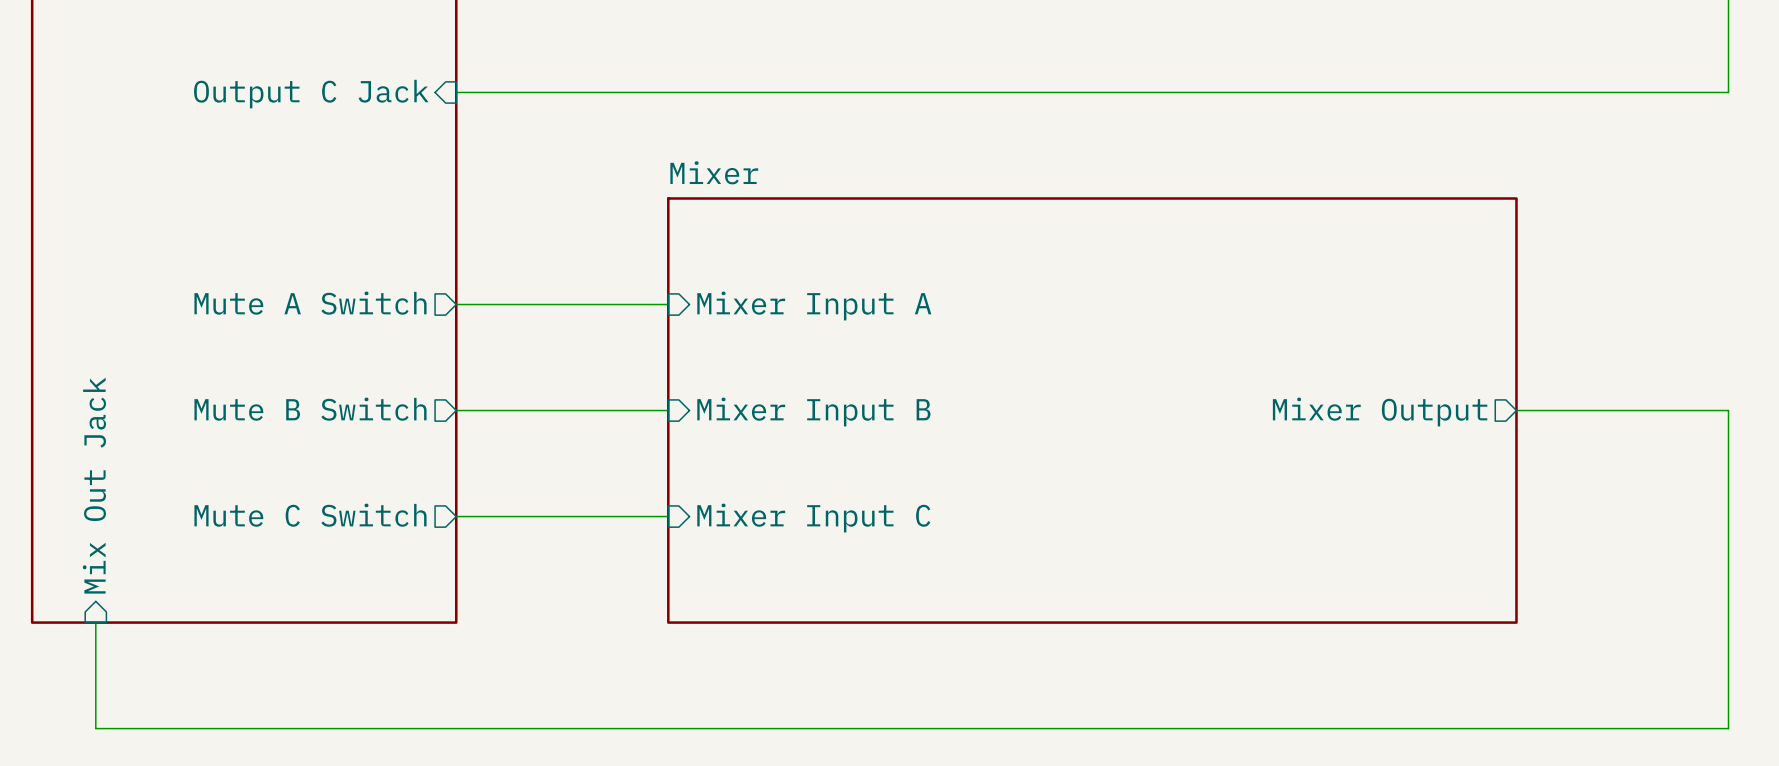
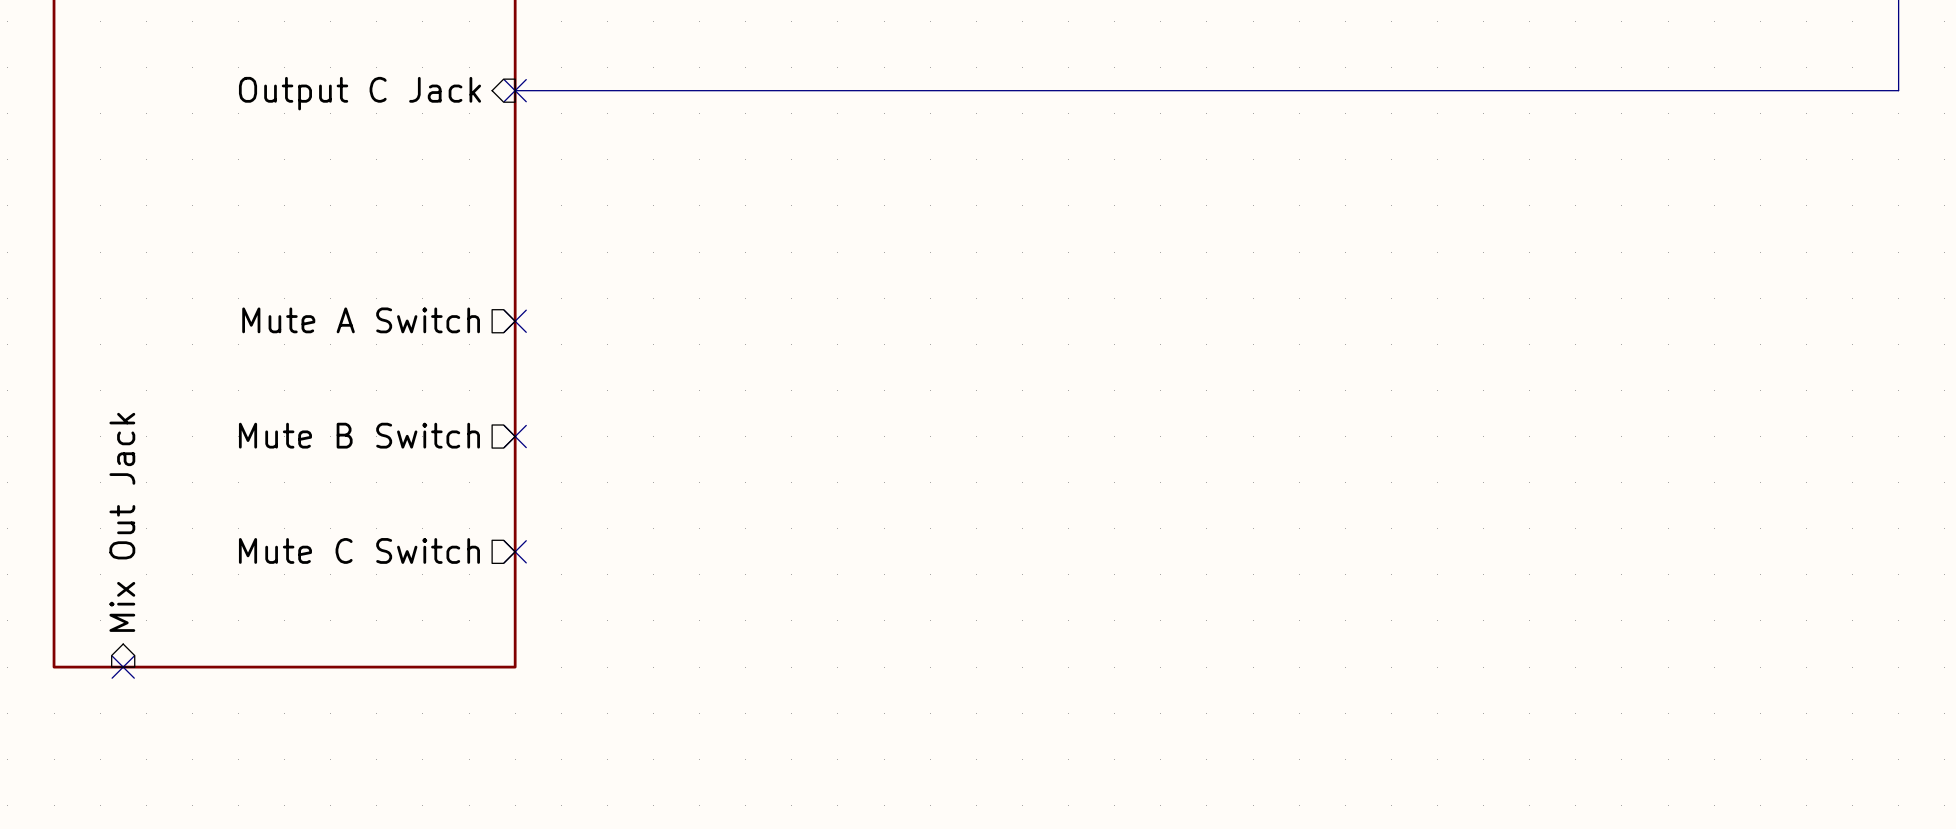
no-connect mark: none -> (515, 90)
wire: (456, 304) (668, 304) -> none
no-connect mark: none -> (515, 321)
sheet pin: Mixer Input A (814, 306) -> none
wire: (456, 410) (668, 410) -> none
no-connect mark: none -> (515, 436)
sheet Mixer: (1092, 410) -> none
wire: (1516, 410) (1728, 410) (1728, 728) (95, 728) (95, 622) -> none
sheet pin: Mixer Input B (813, 412) -> none
sheet pin: Mixer Output (1380, 412) -> none
wire: (456, 516) (668, 516) -> none
no-connect mark: none -> (515, 551)
sheet pin: Mixer Input C (813, 518) -> none
no-connect mark: none -> (123, 667)

